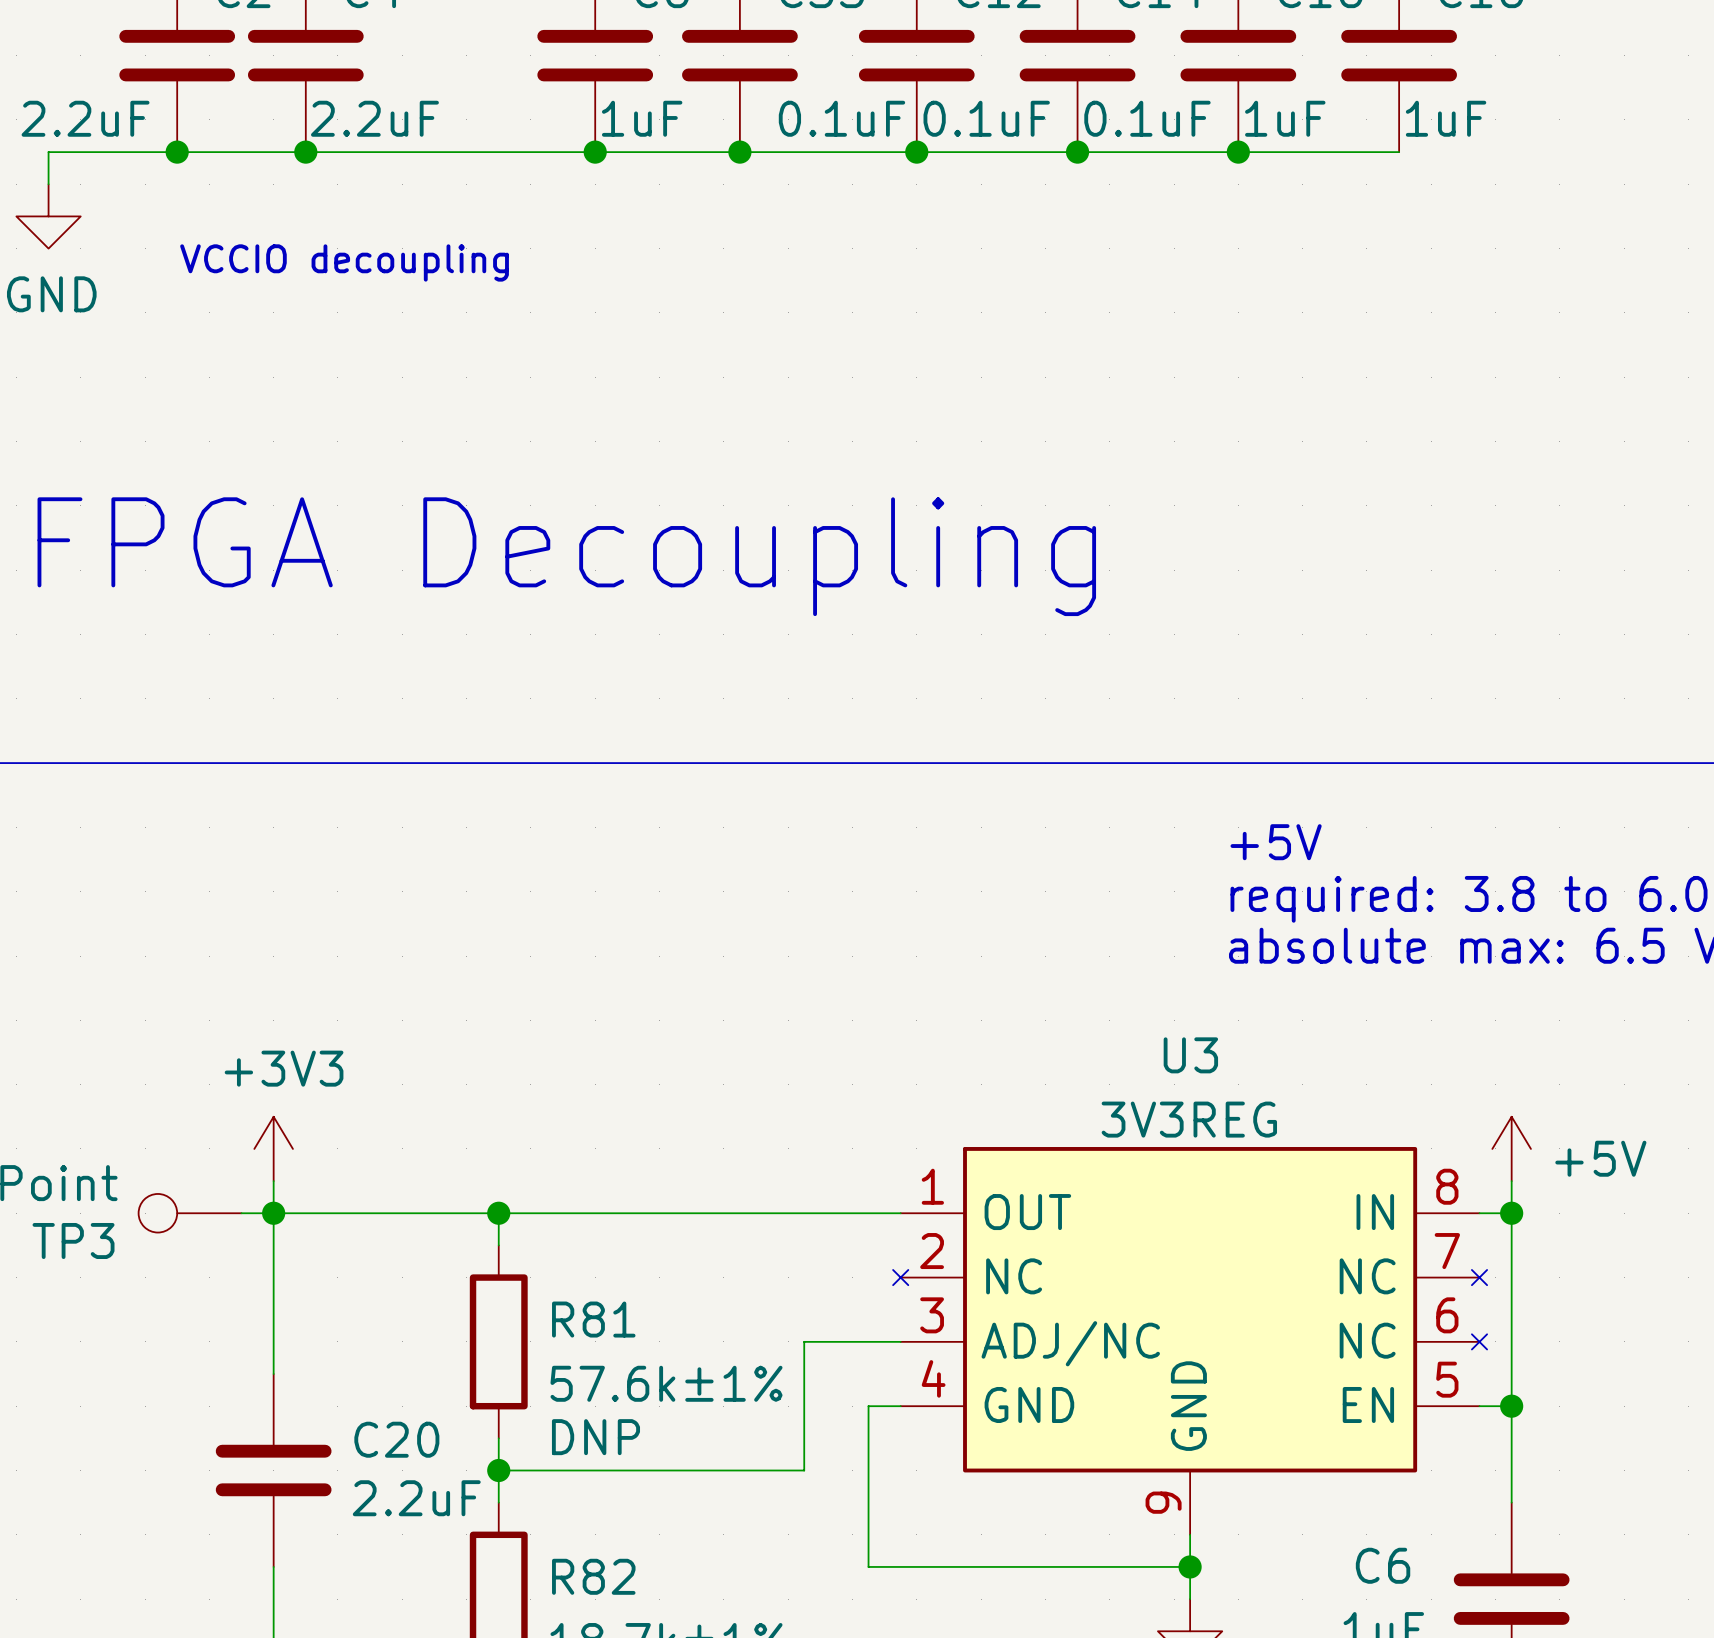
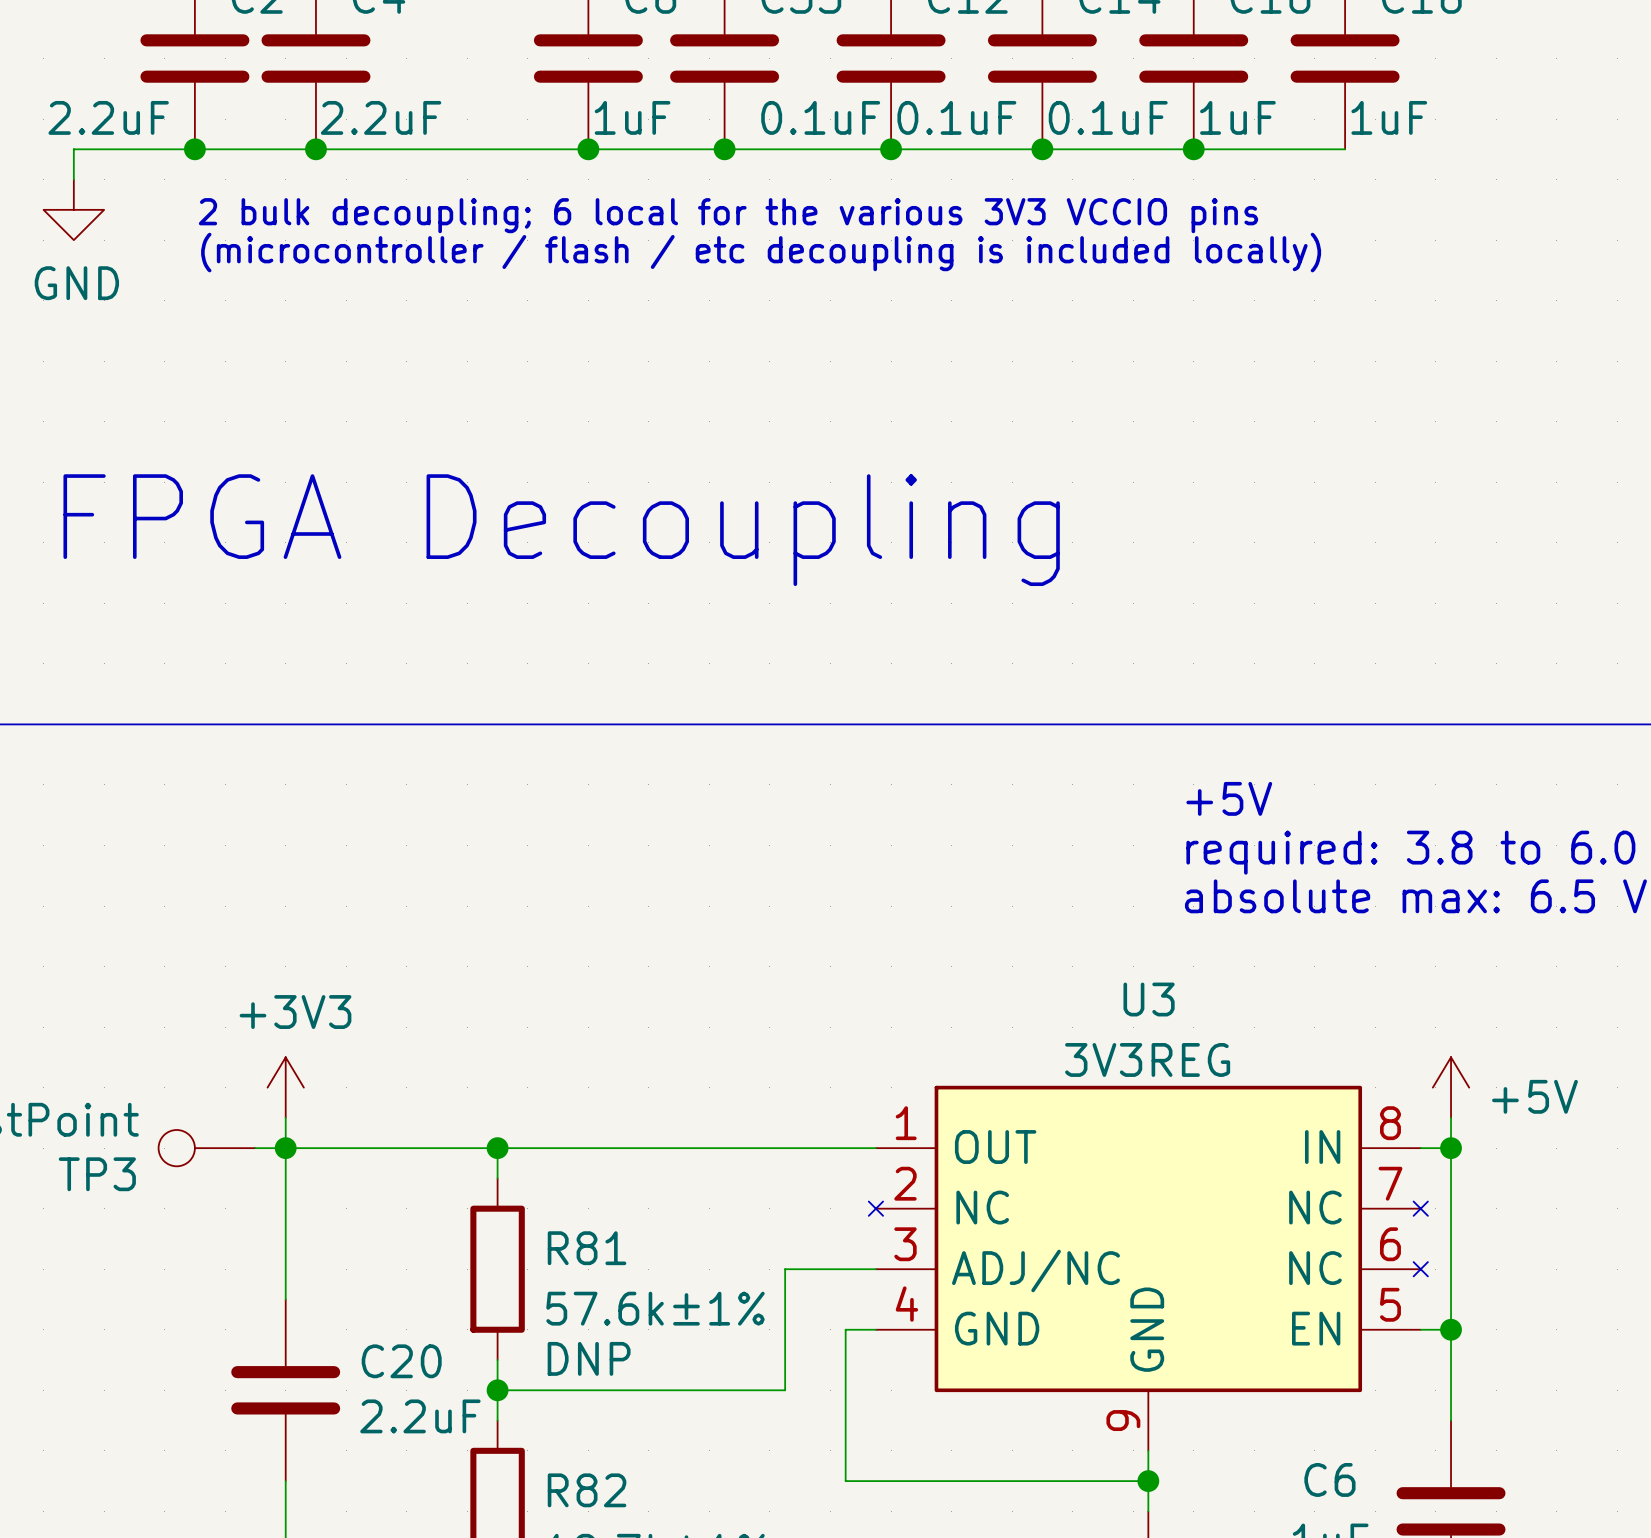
text: none -> 2 bulk decoupling; 6 local for the various 3V3 VCCIO pins (728, 215)
text: VCCIO decoupling (344, 262) -> (microcontroller / flash / etc decoupling is included locally) (761, 252)

